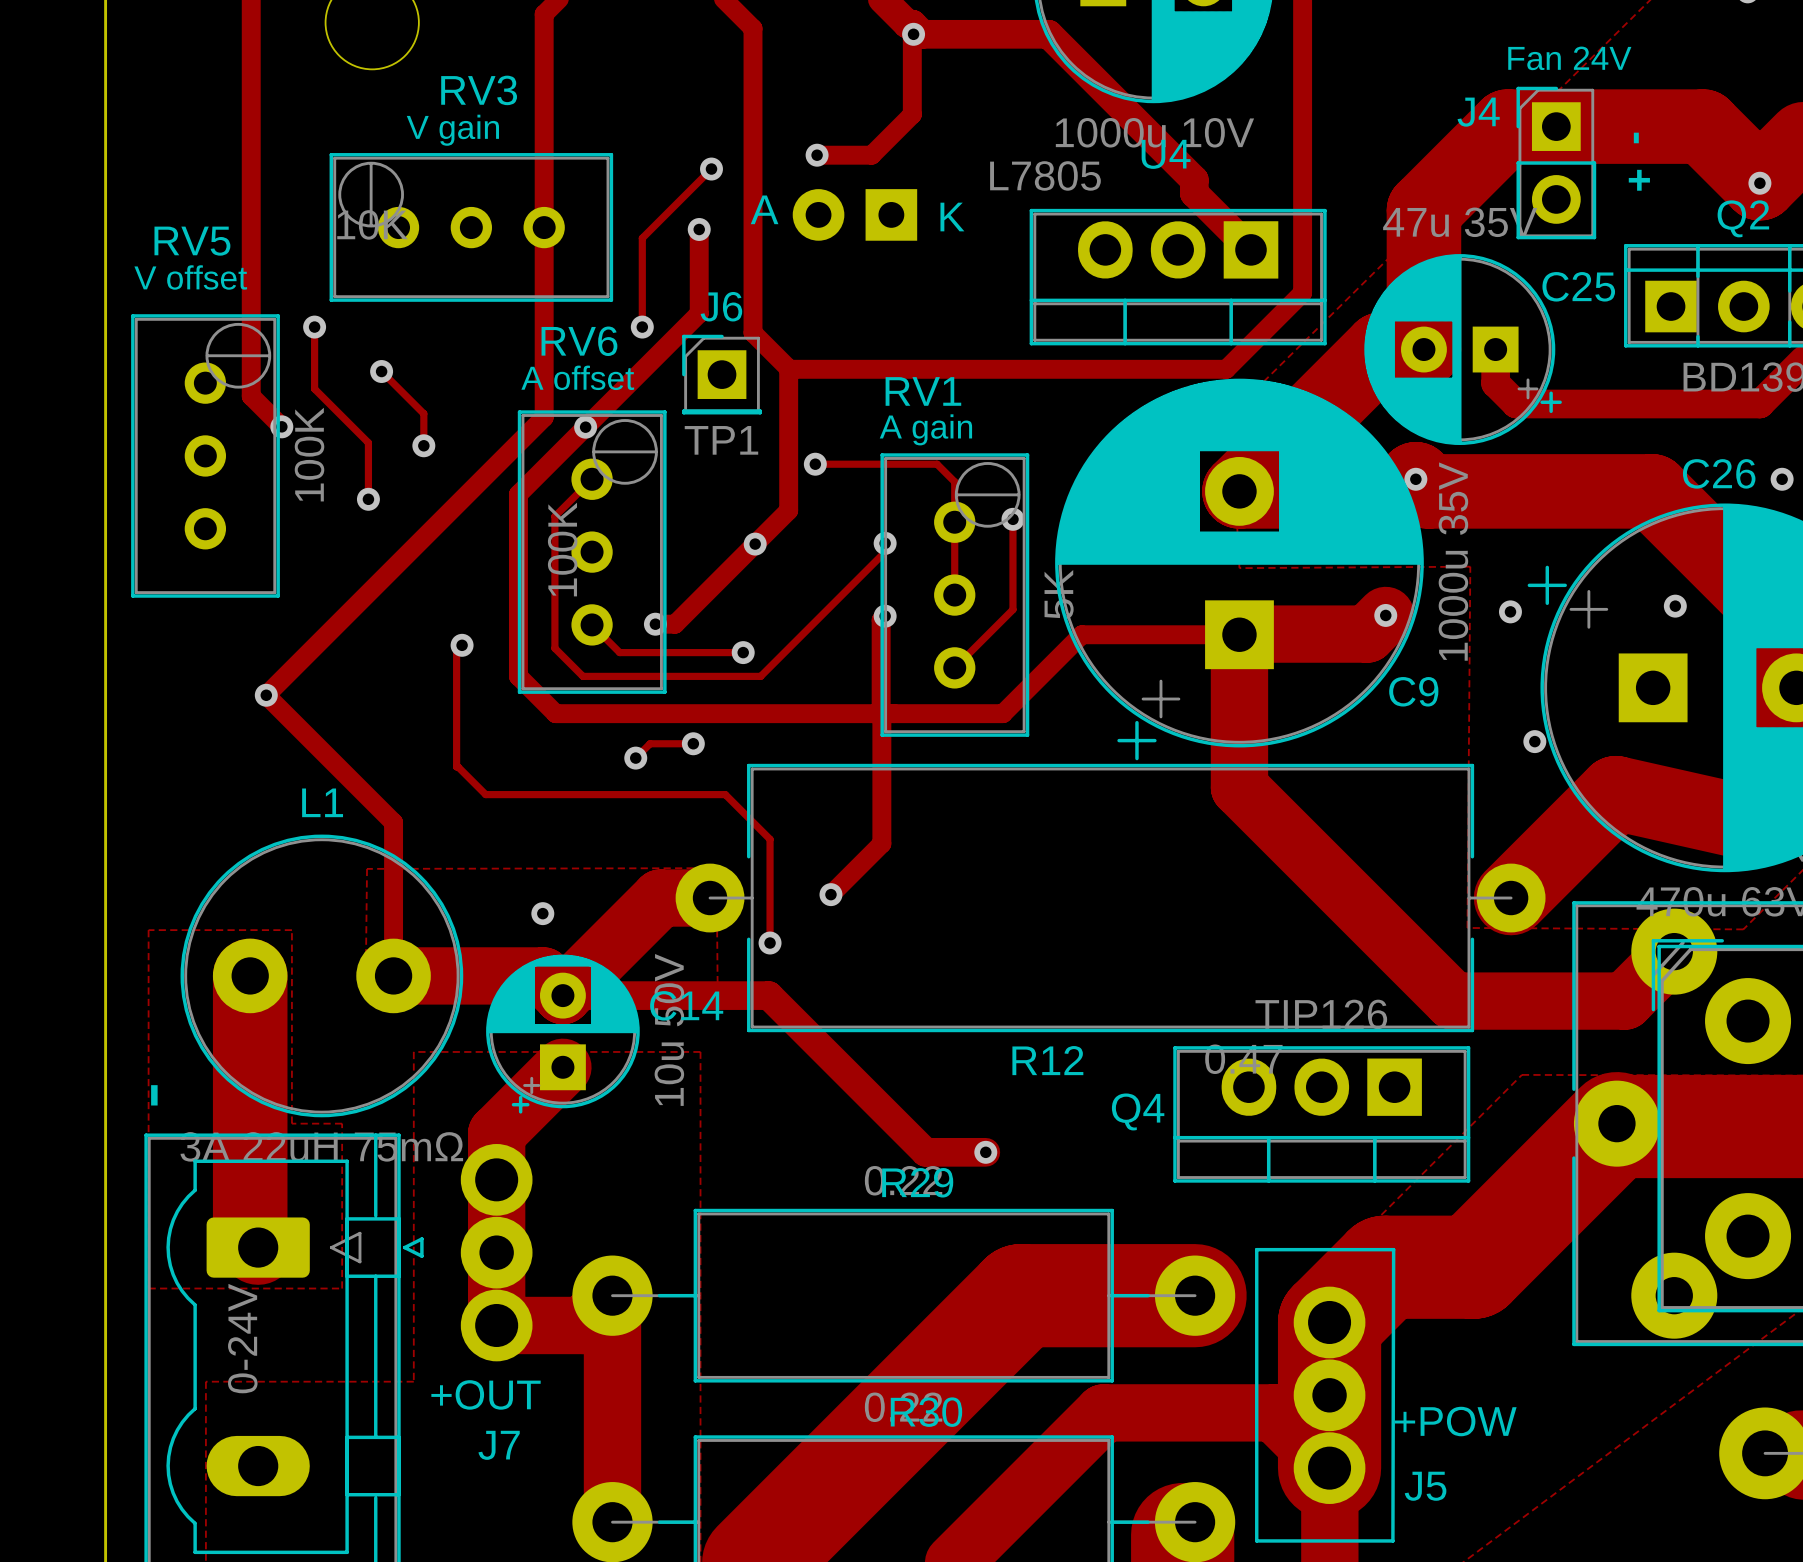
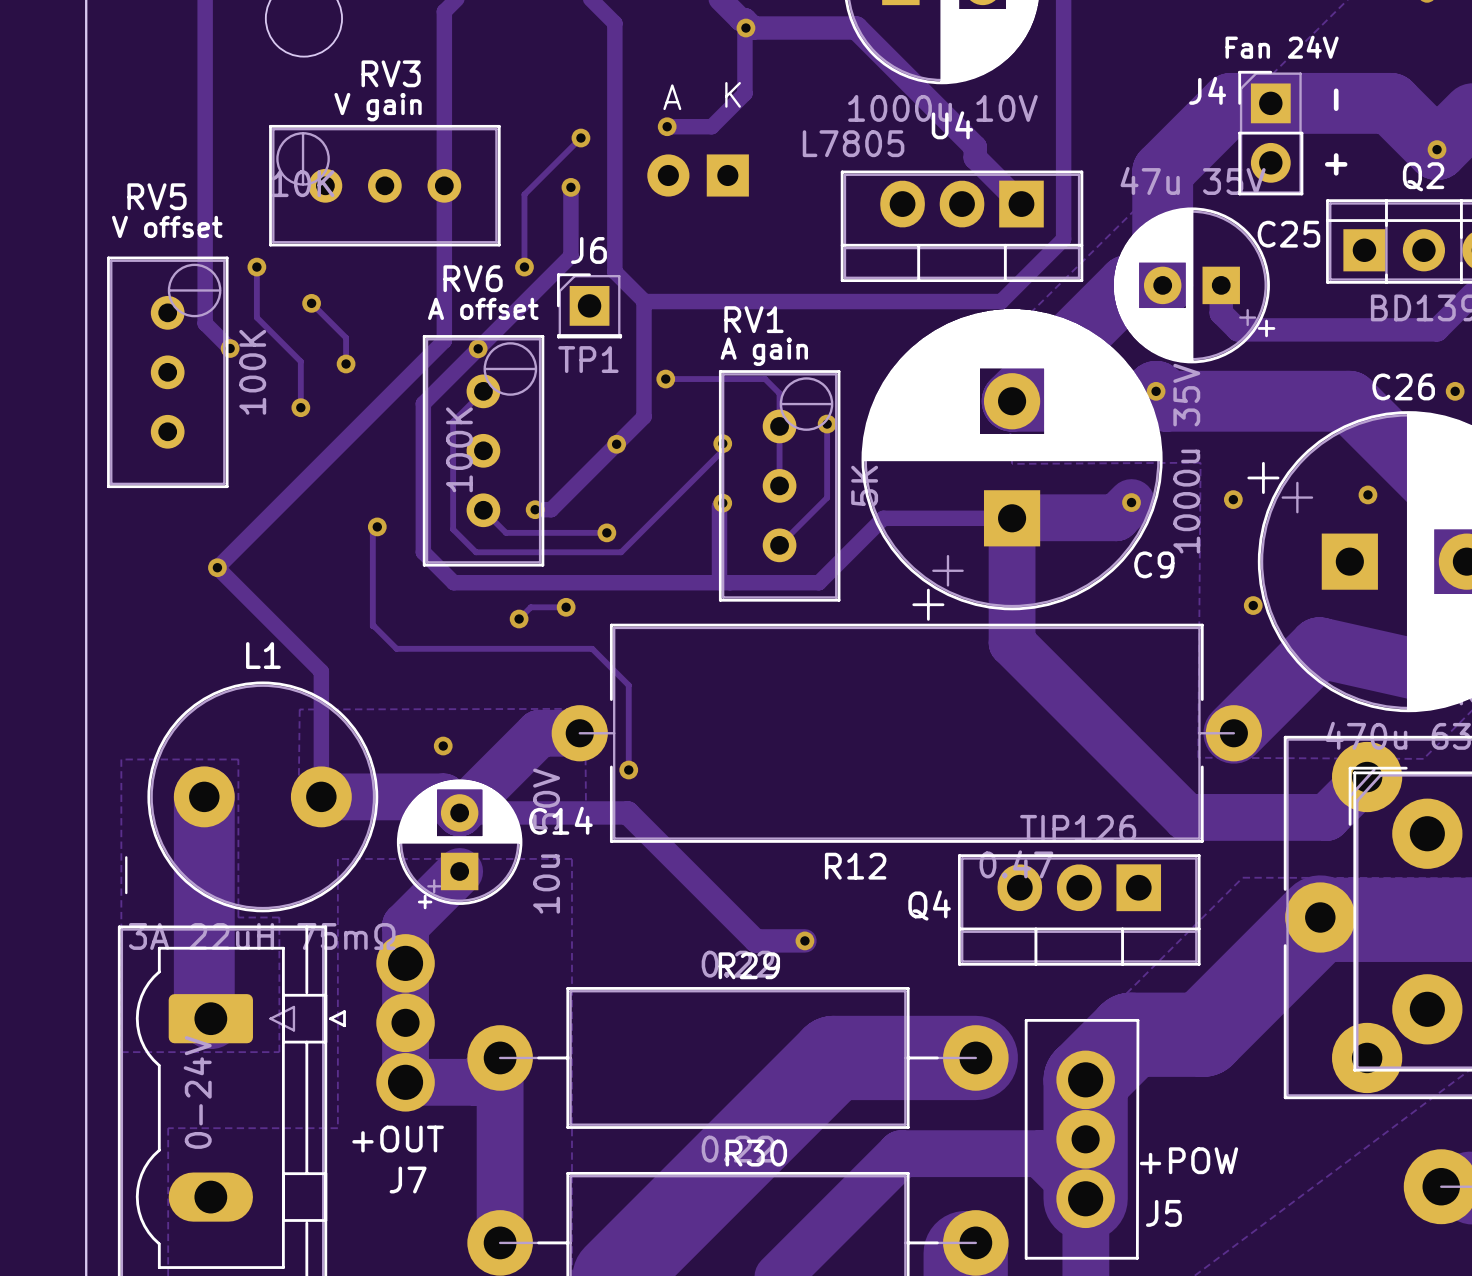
text position: A (764, 209) -> A (672, 97)
text position: K (952, 217) -> K (733, 94)
track: (881, 713) (881, 843) (830, 894) -> none
via: (830, 894) -> none

